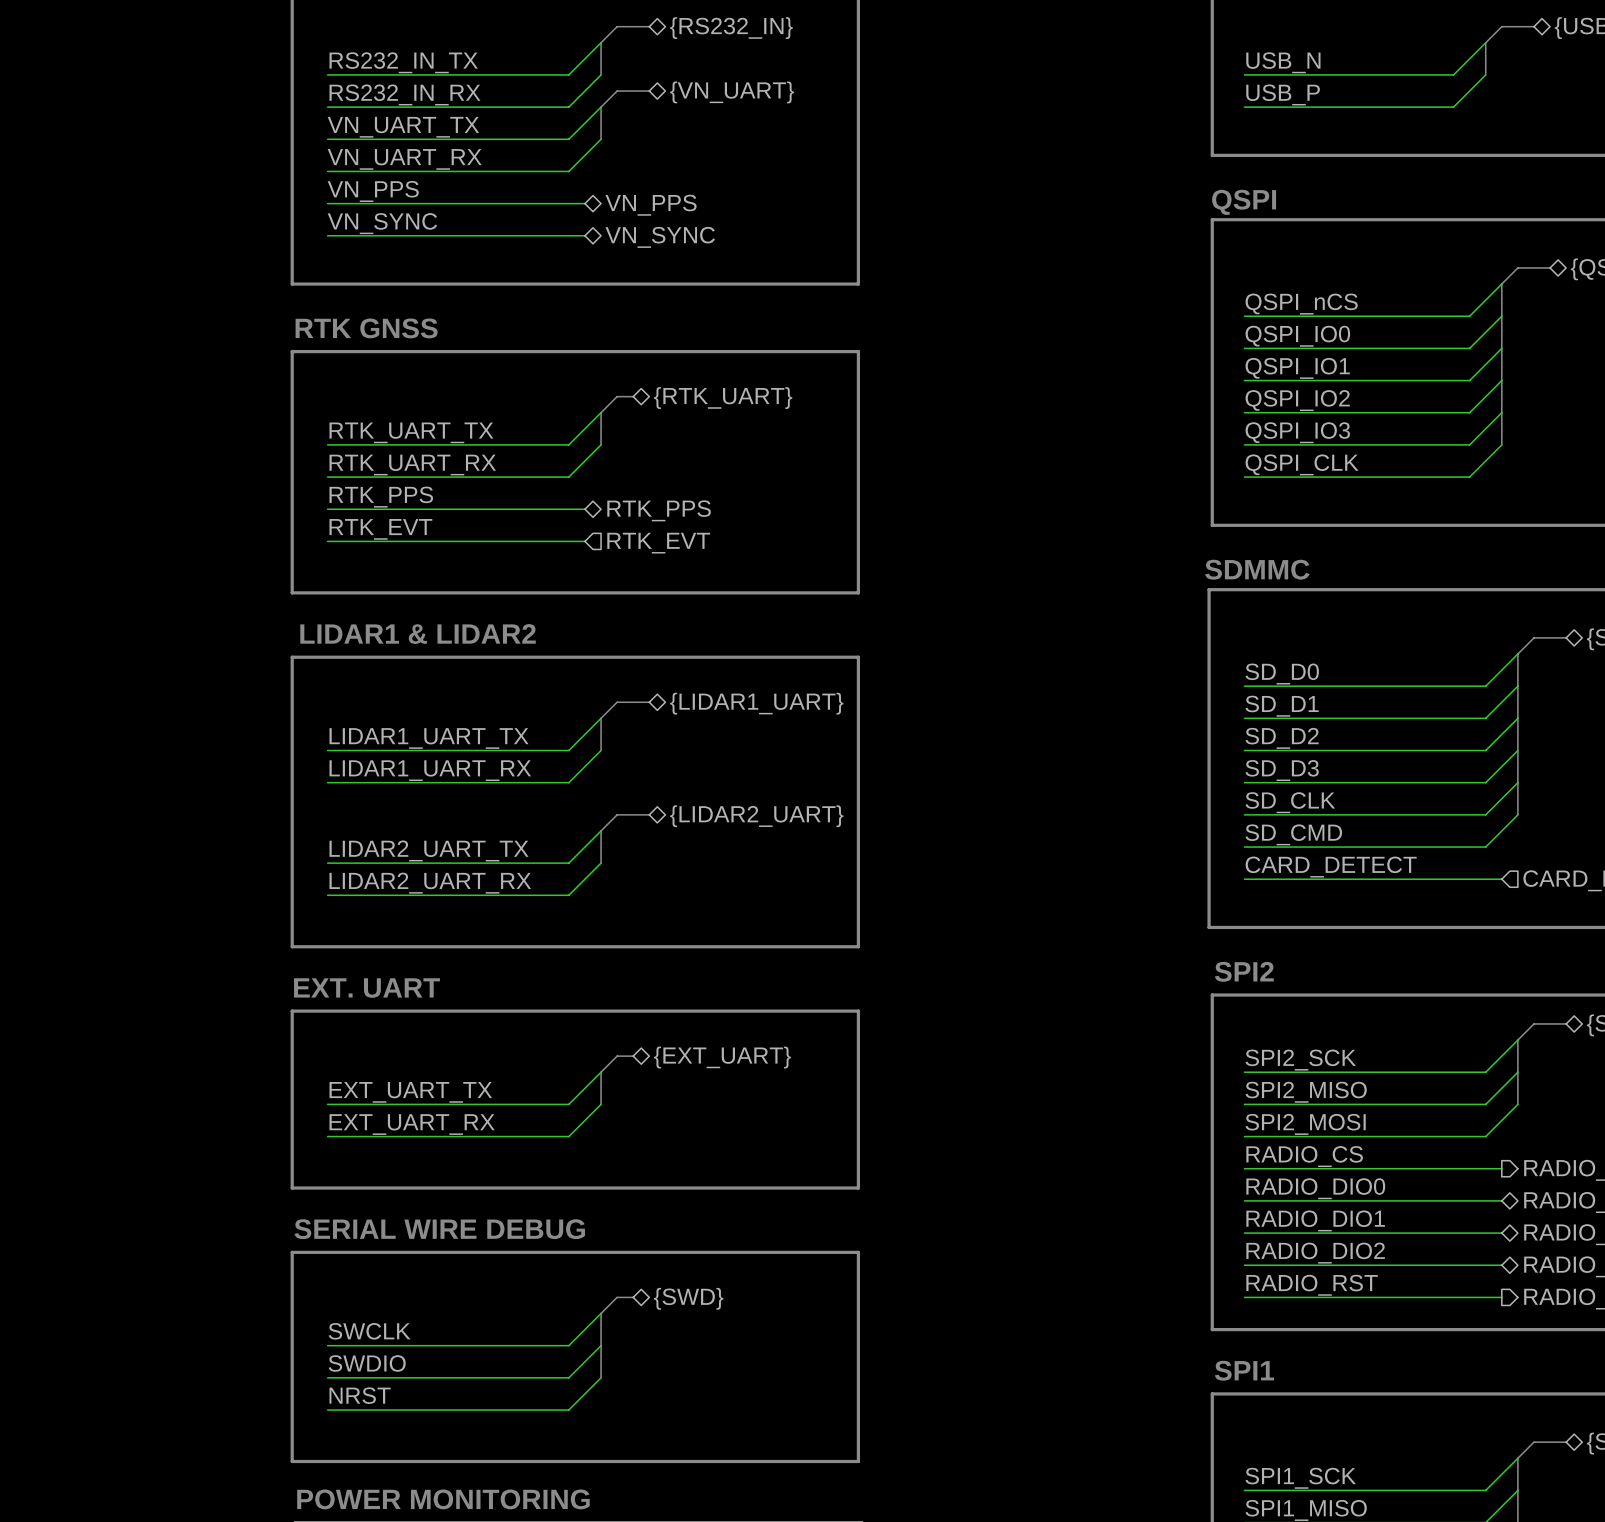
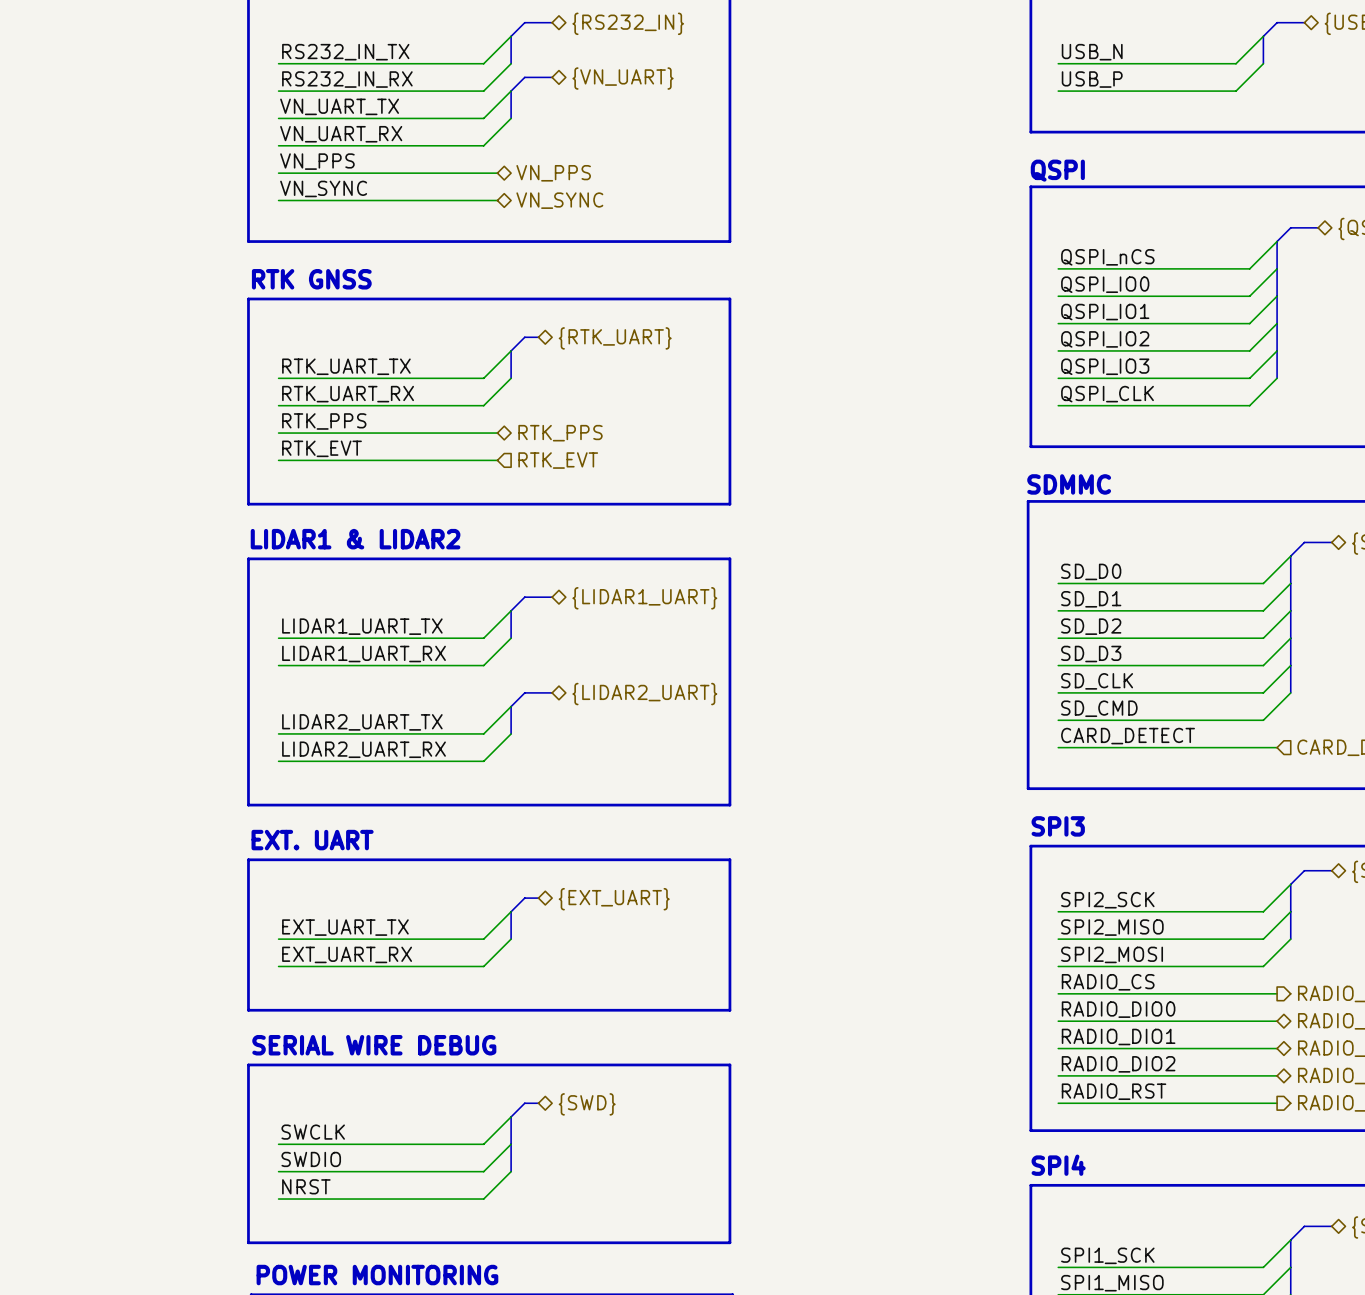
text: SPI2 (1244, 971) -> SPI3 (1058, 826)
text: SPI1 (1244, 1370) -> SPI4 (1058, 1165)

